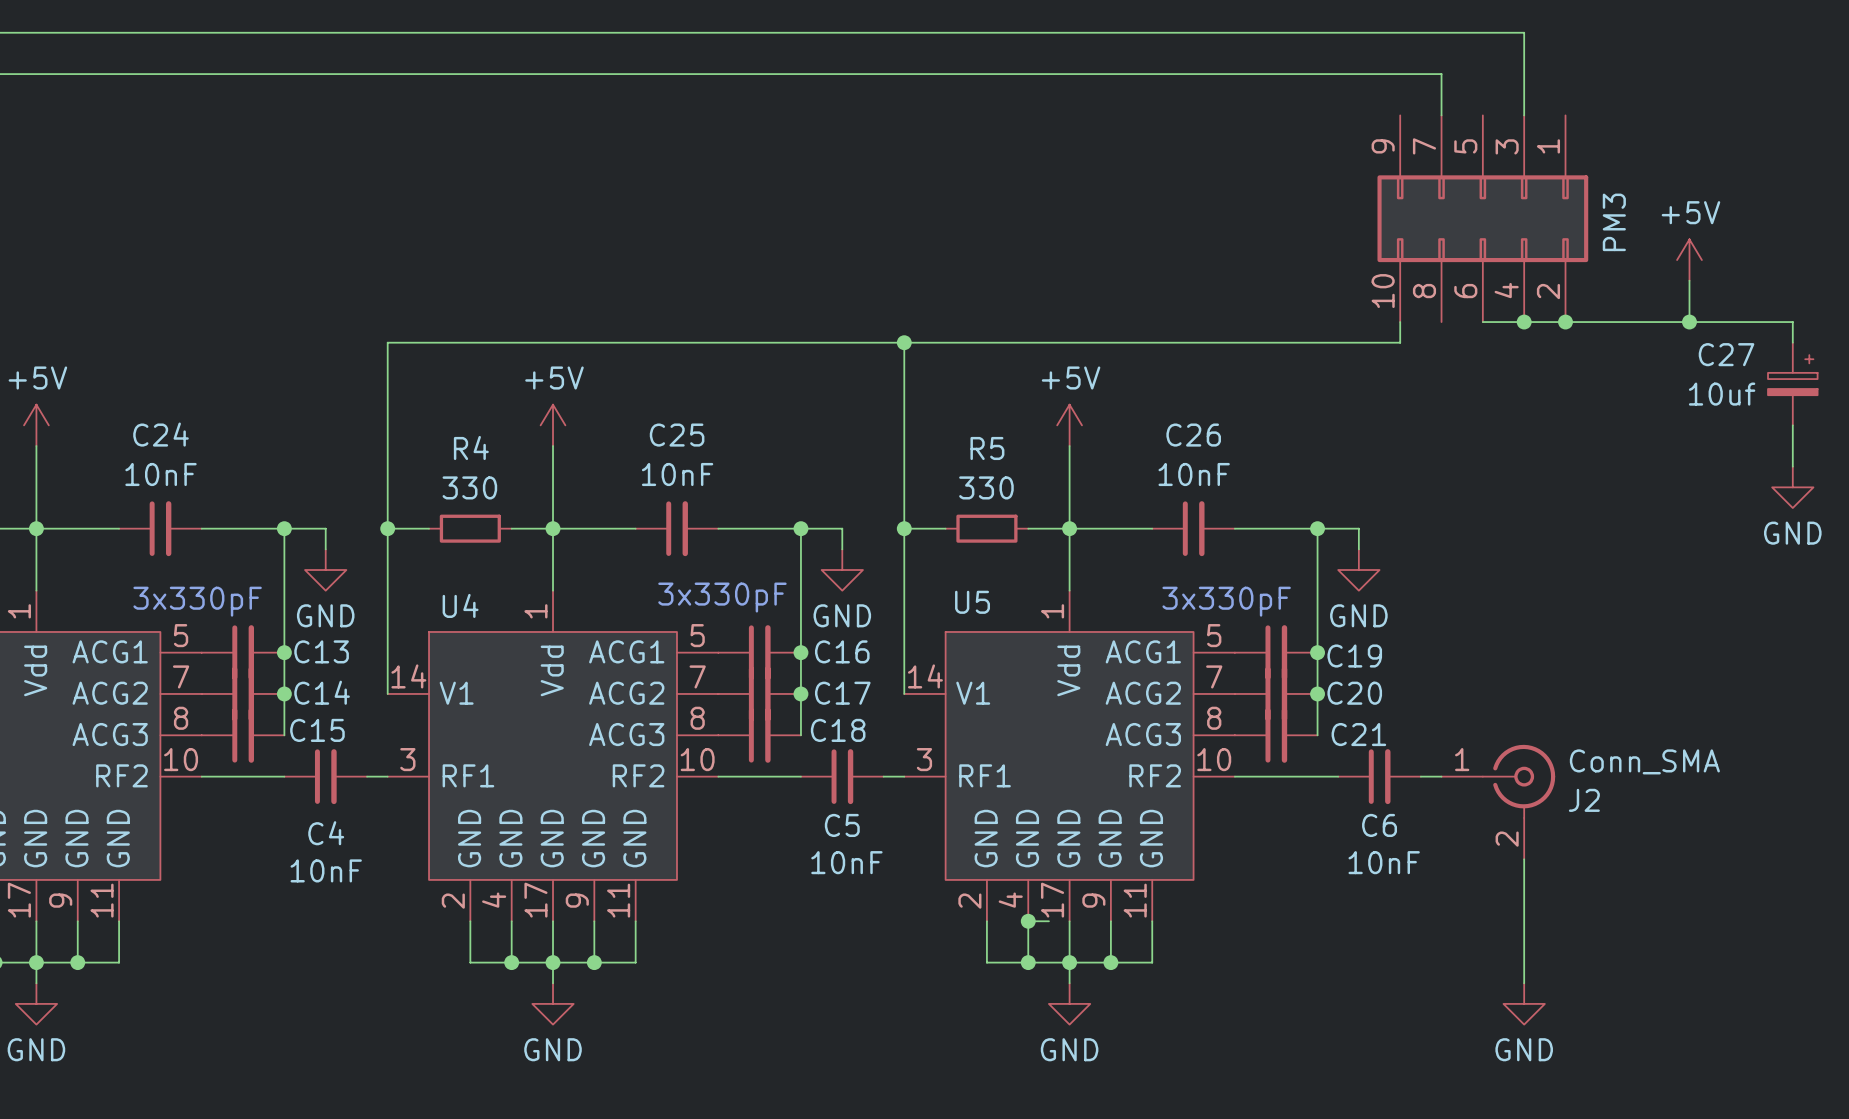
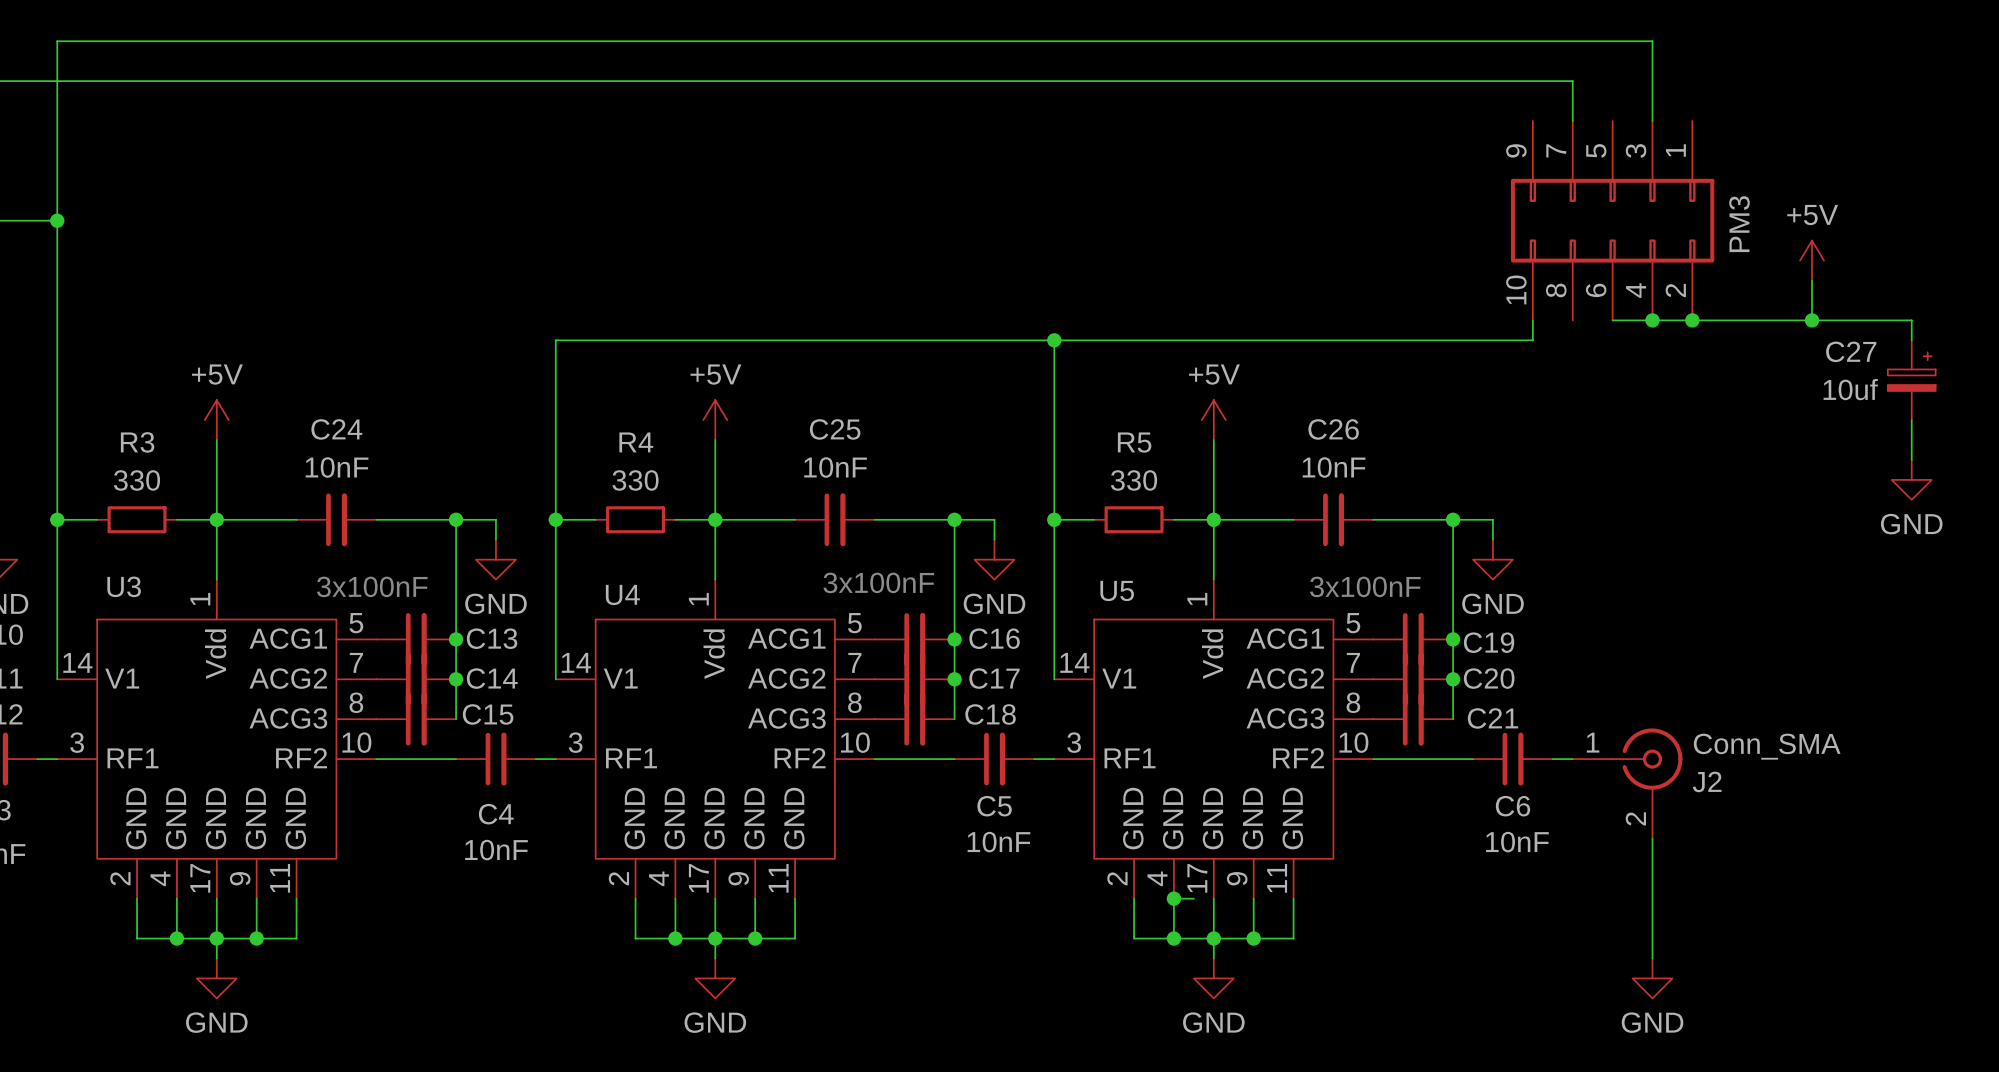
text: 3x330pF (722, 597) -> 3x100nF (878, 582)
text: 3x330pF (197, 601) -> 3x100nF (372, 586)
text: 3x330pF (1226, 601) -> 3x100nF (1365, 586)

